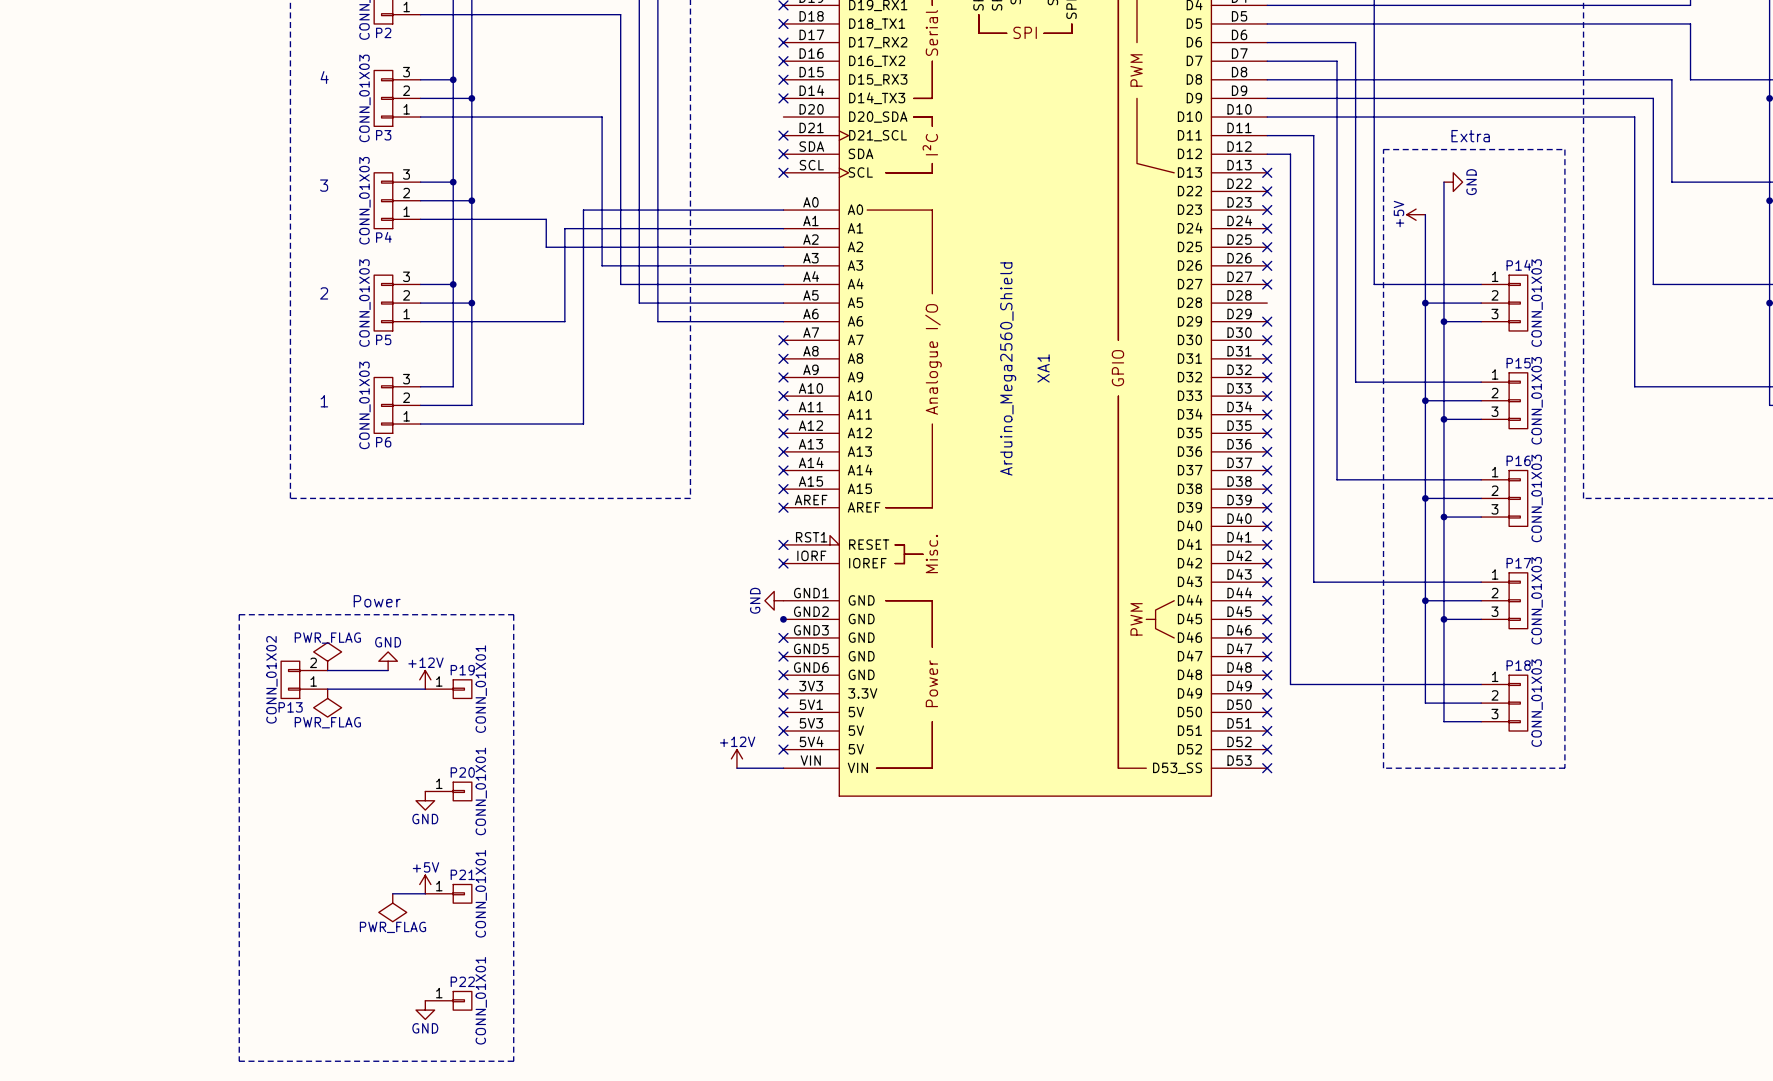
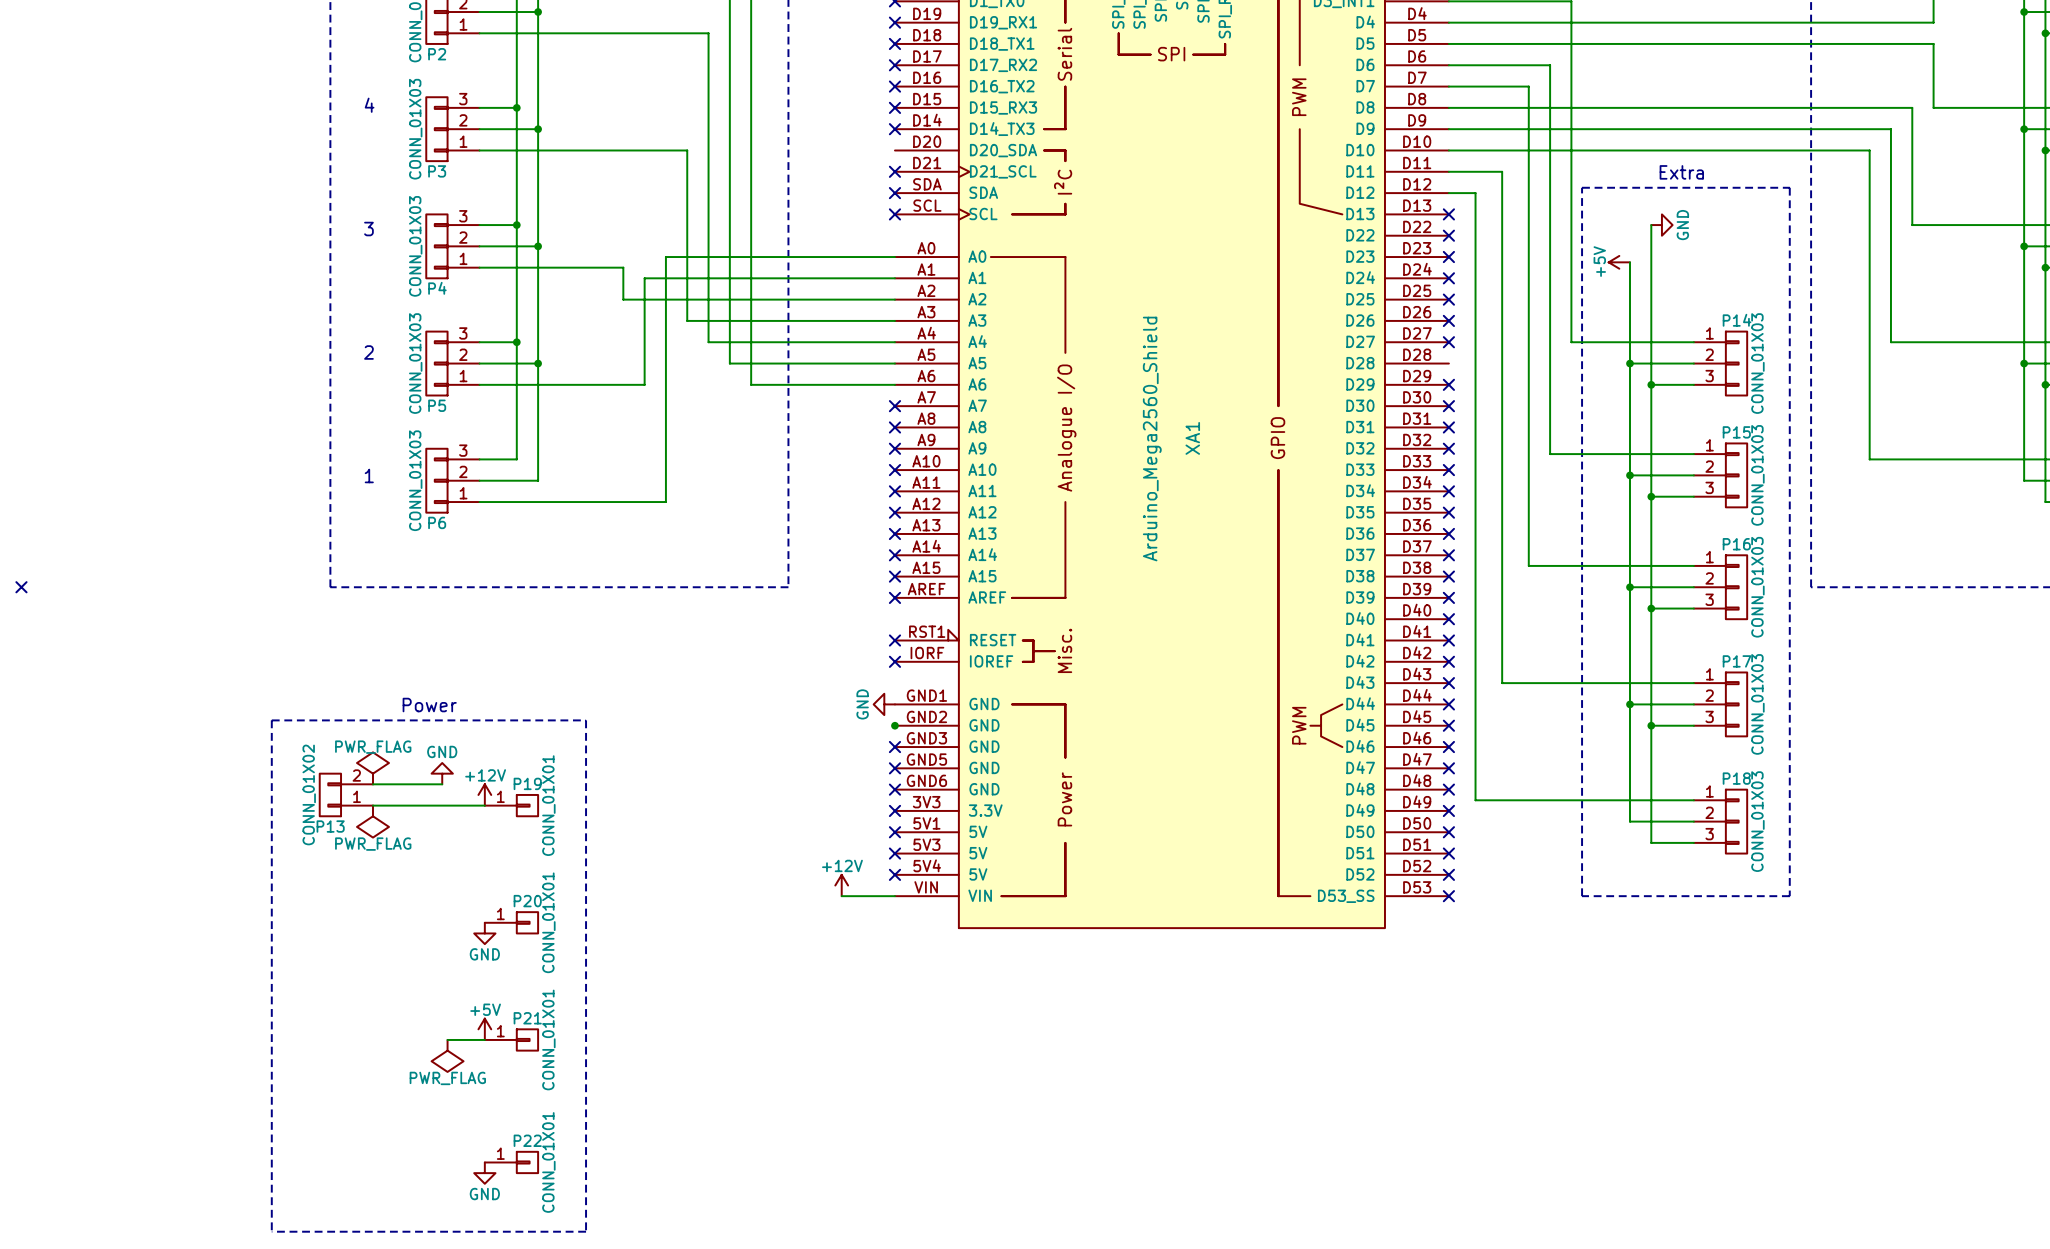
no-connect mark: none -> (21, 587)

